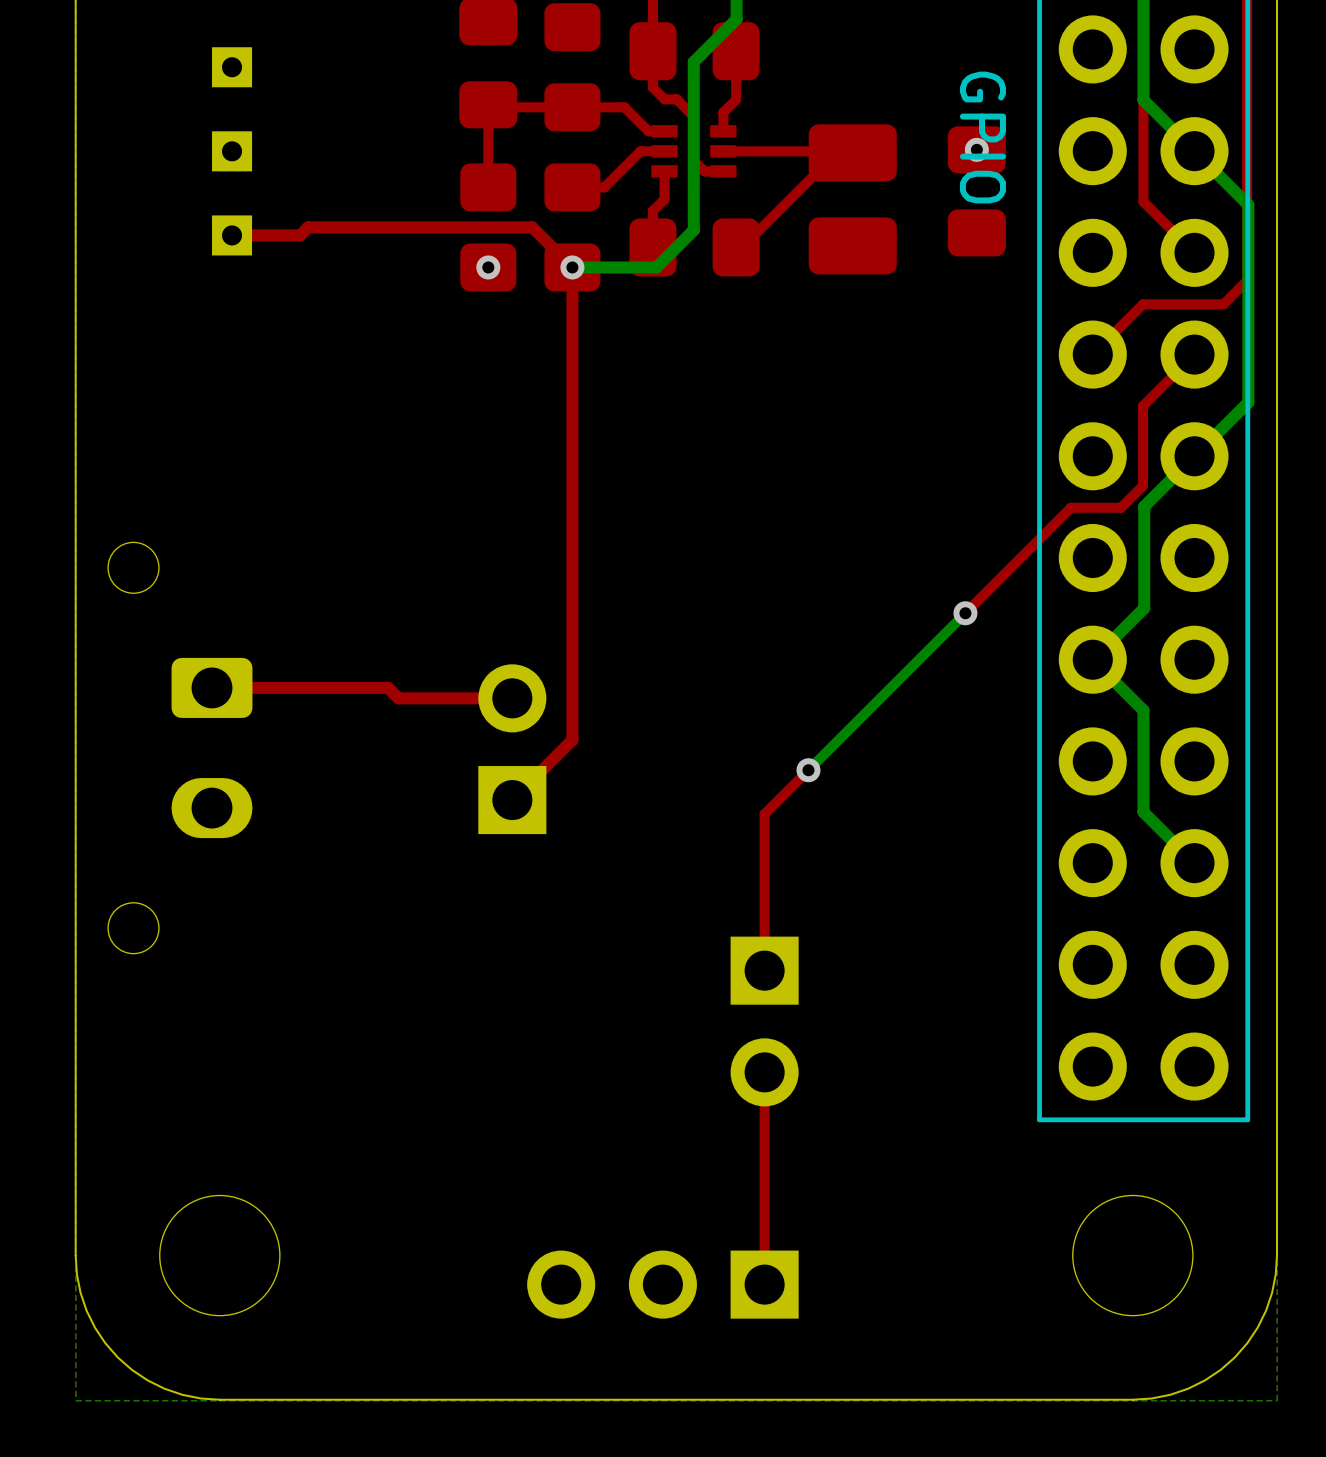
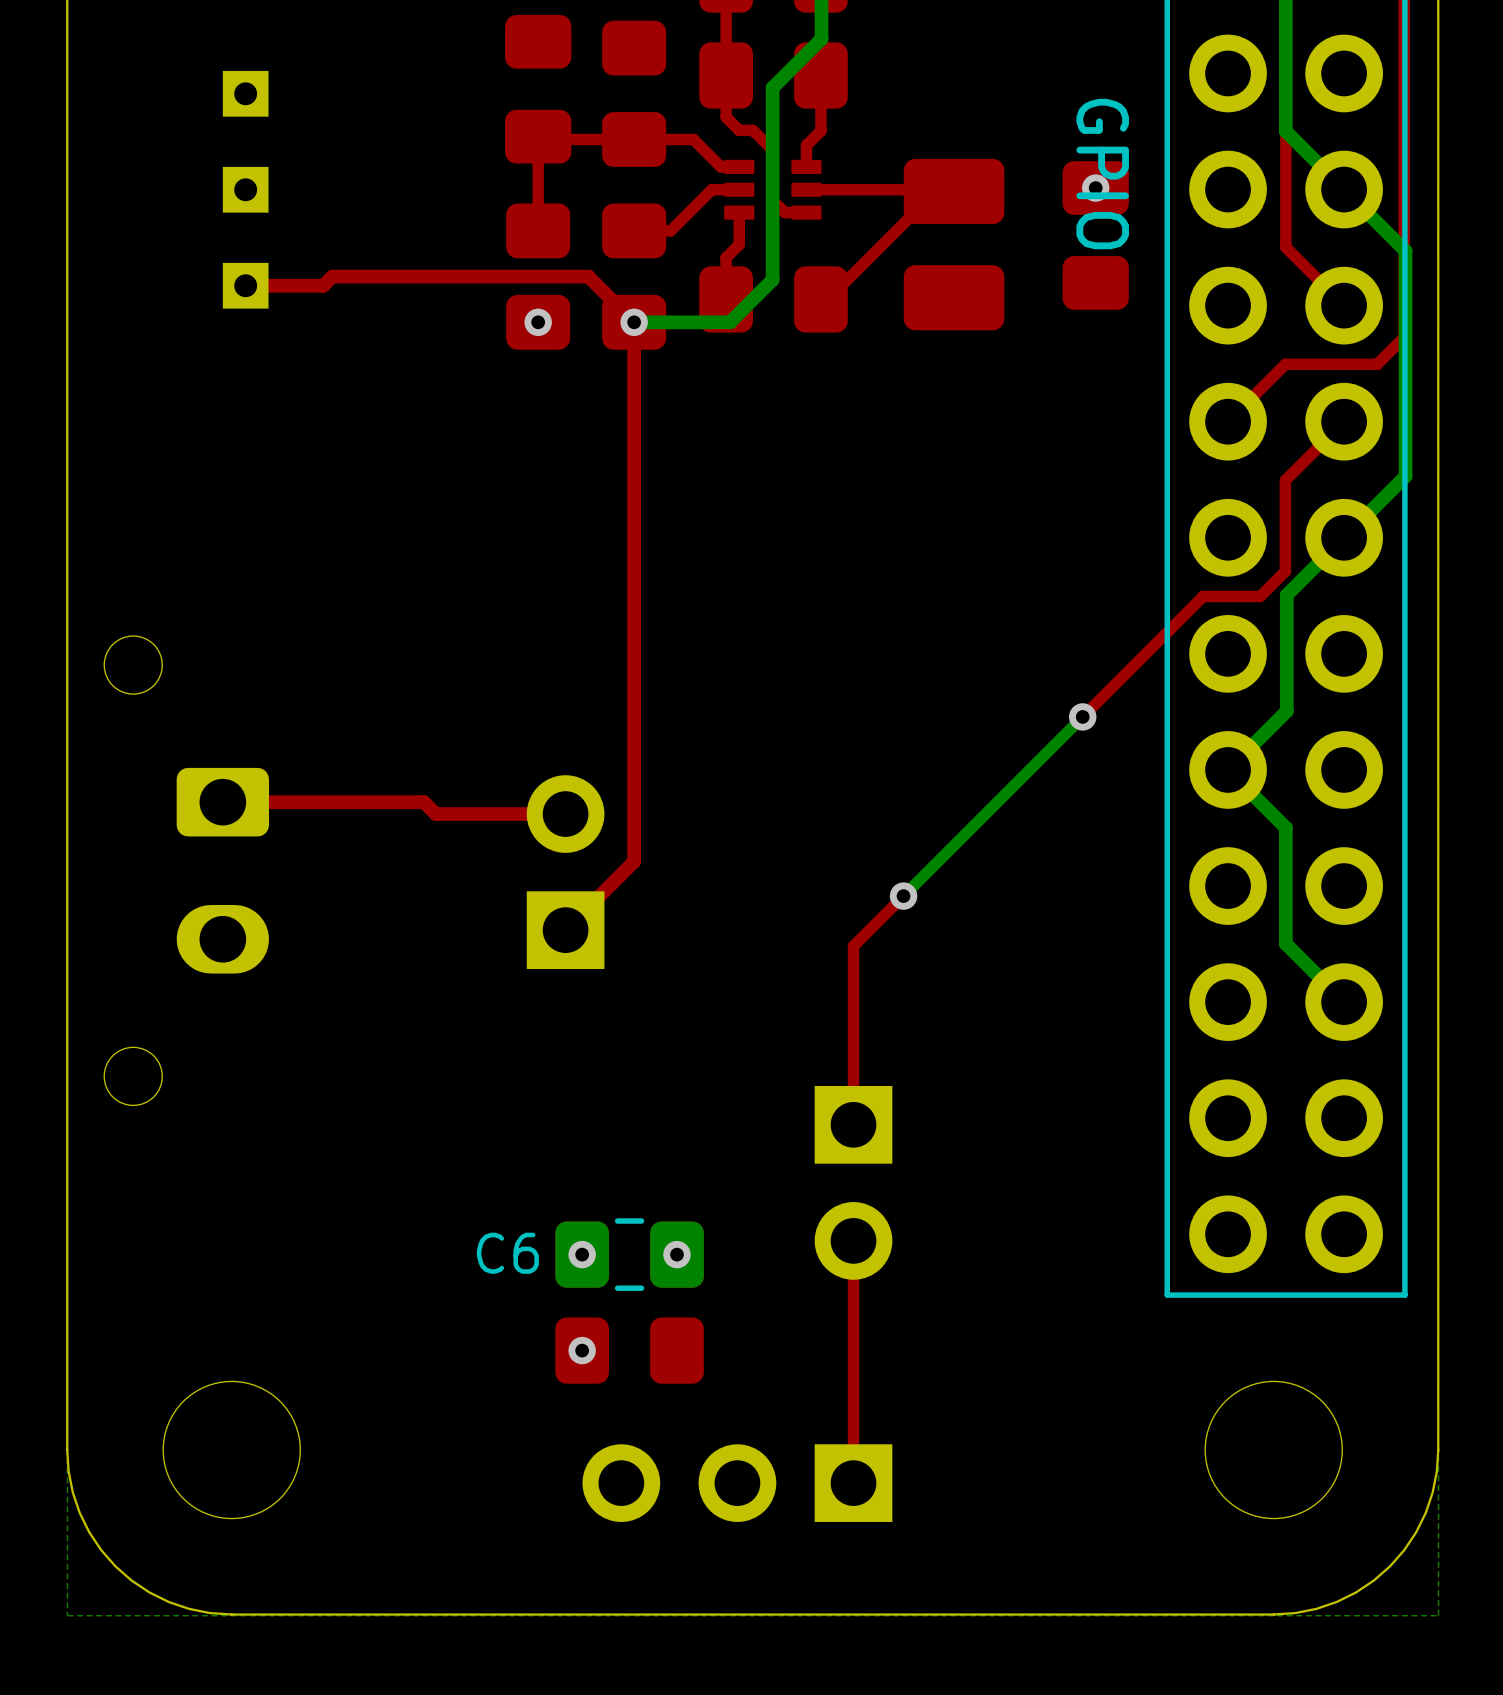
via: none -> (582, 1254)
C6: none -> (629, 1254)
via: none -> (676, 1254)
via: none -> (582, 1350)
part: none -> (629, 1350)

